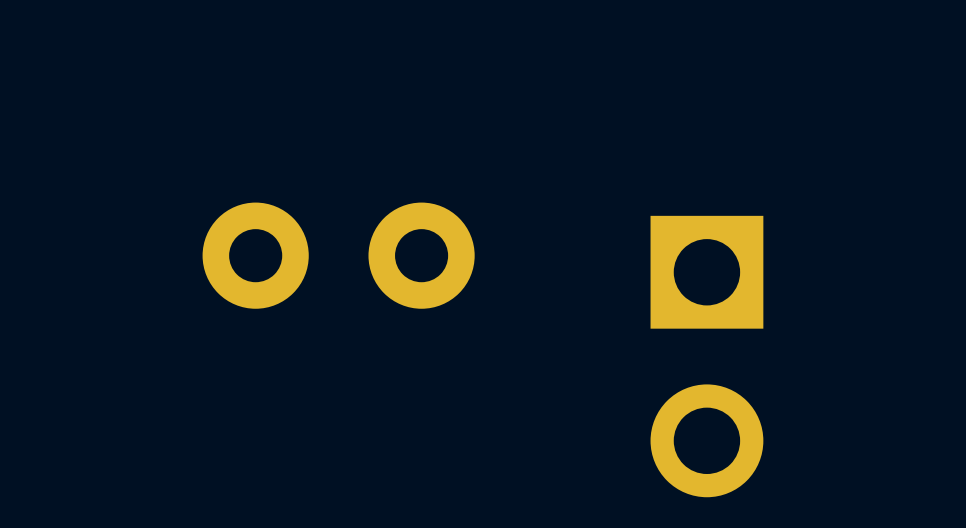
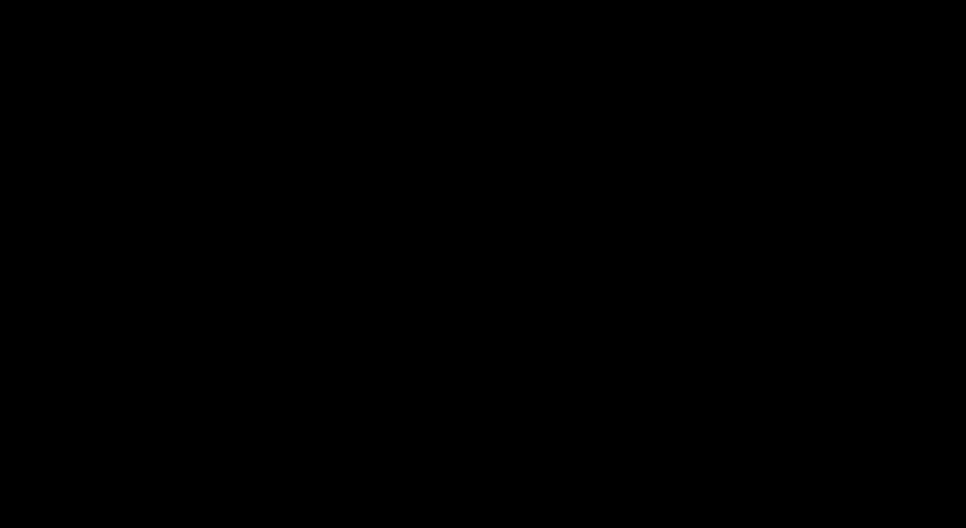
part: (338, 255) -> none
part: (706, 356) -> none

